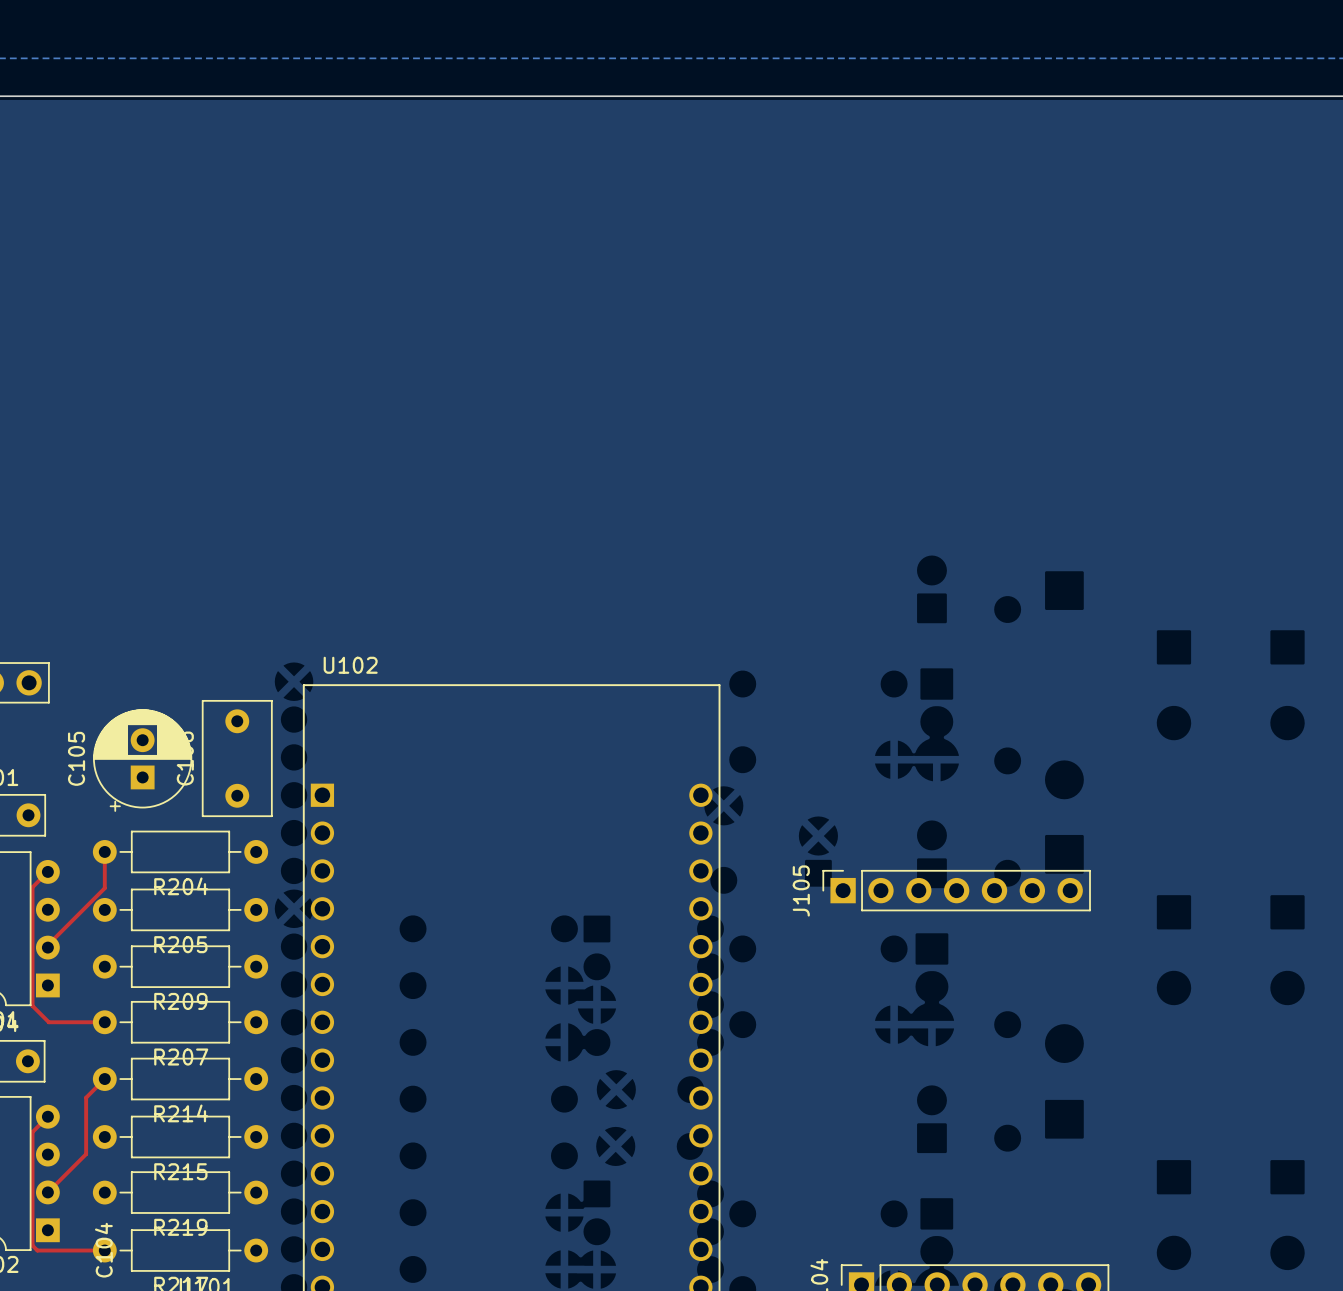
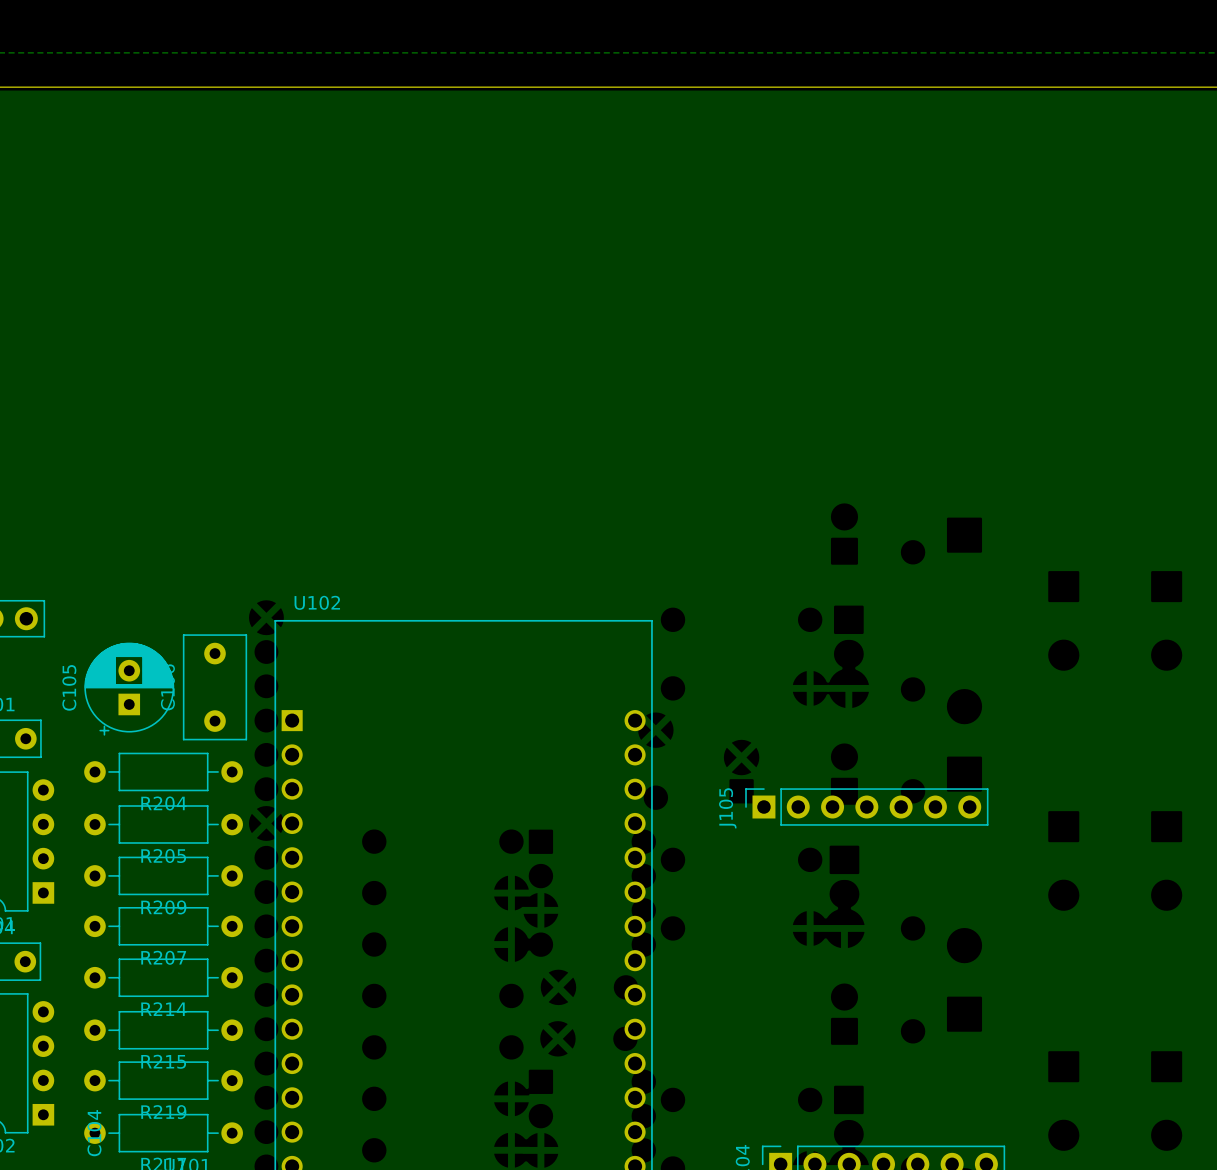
top track: (104, 851) (104, 888) (47, 945) (47, 947) -> none
top track: (47, 871) (32, 887) (32, 1005) (48, 1022) (104, 1022) -> none
top track: (104, 1079) (86, 1097) (86, 1154) (47, 1192) -> none
top track: (47, 1116) (32, 1132) (32, 1245) (37, 1250) (104, 1250) -> none

